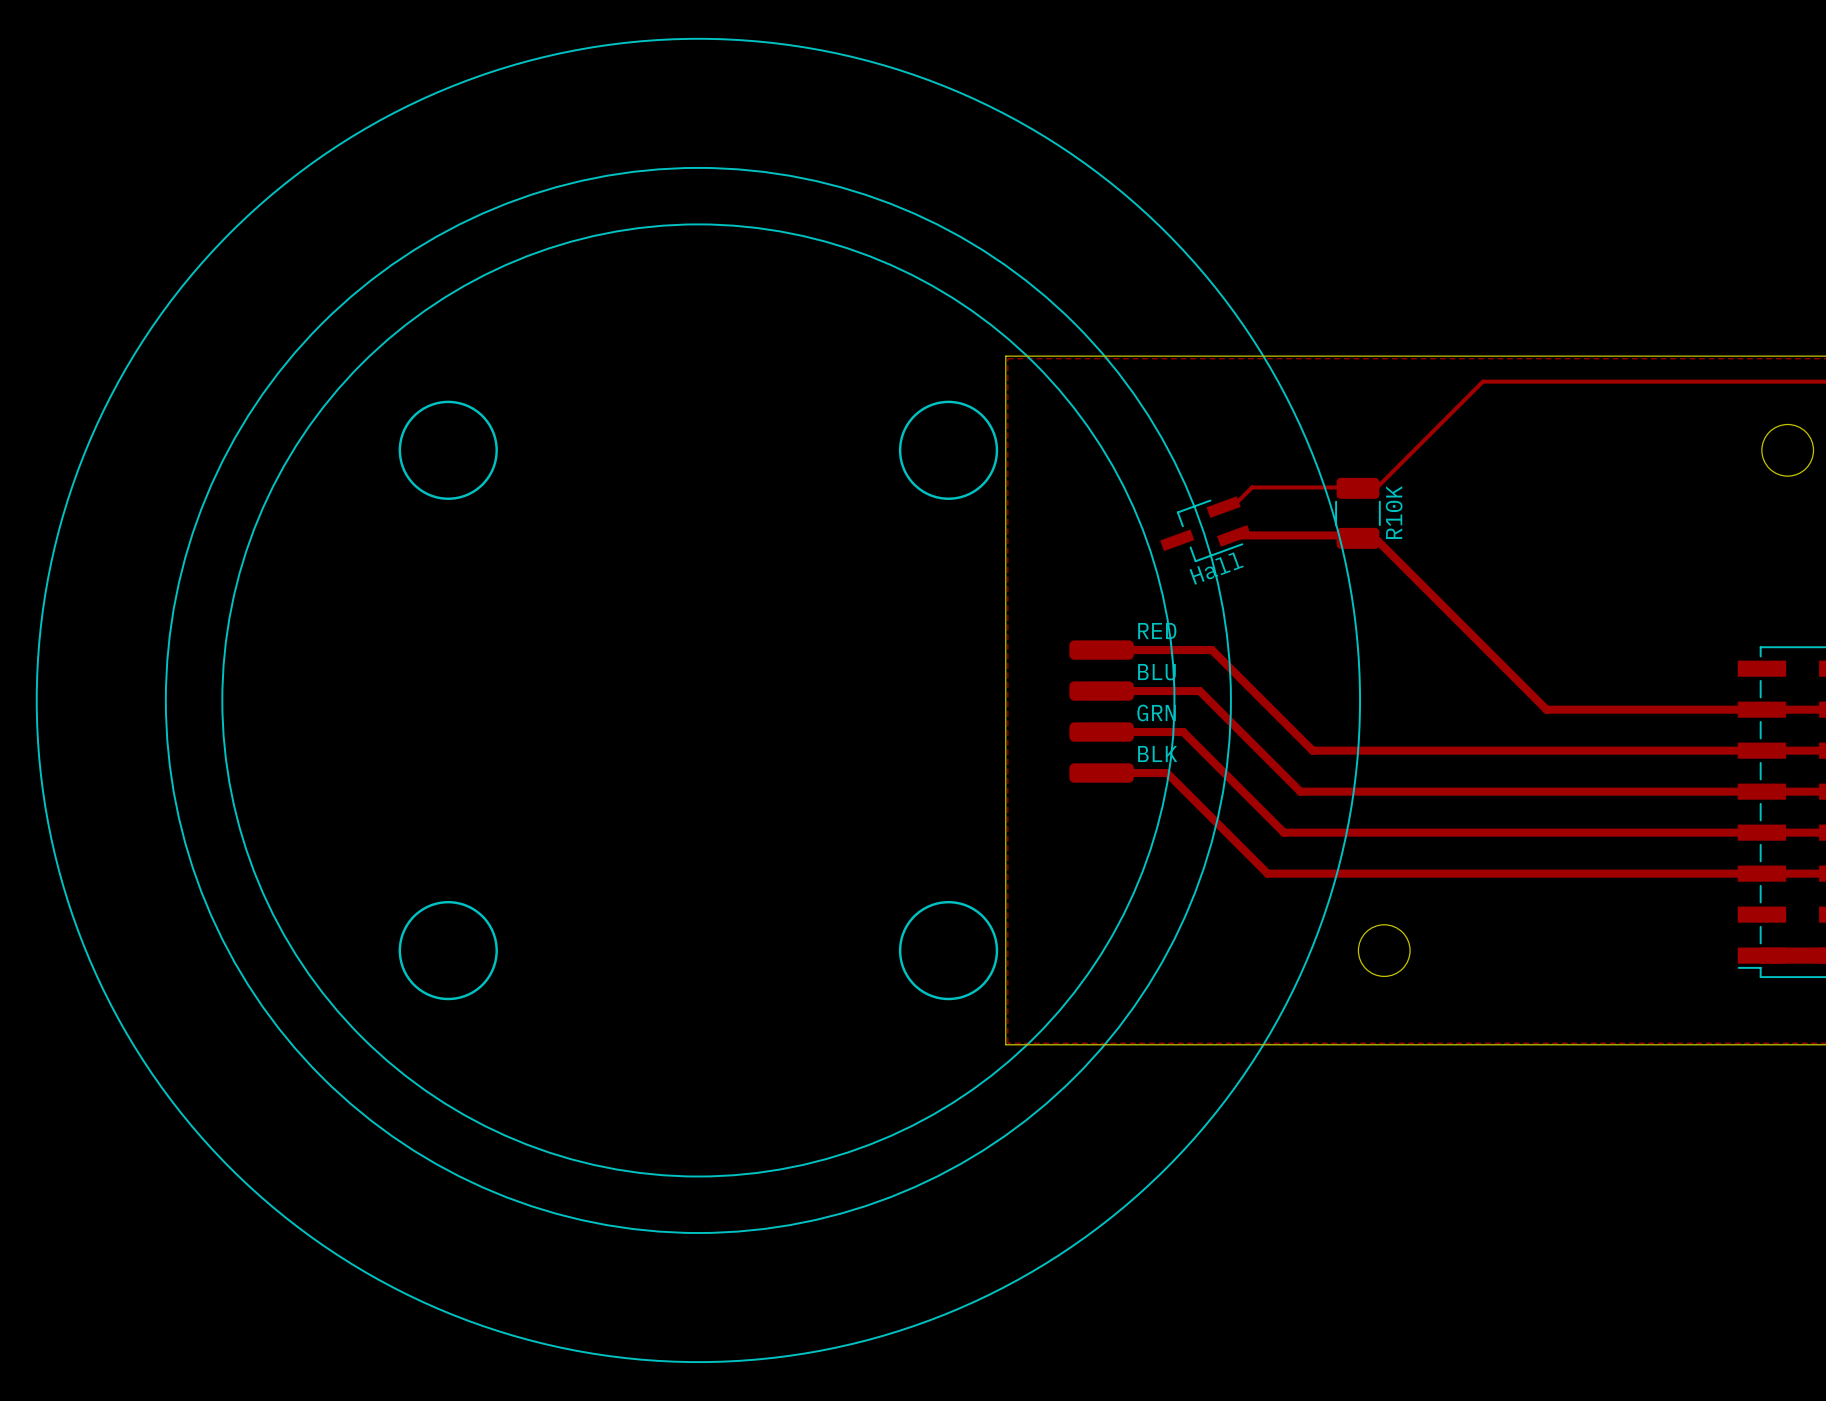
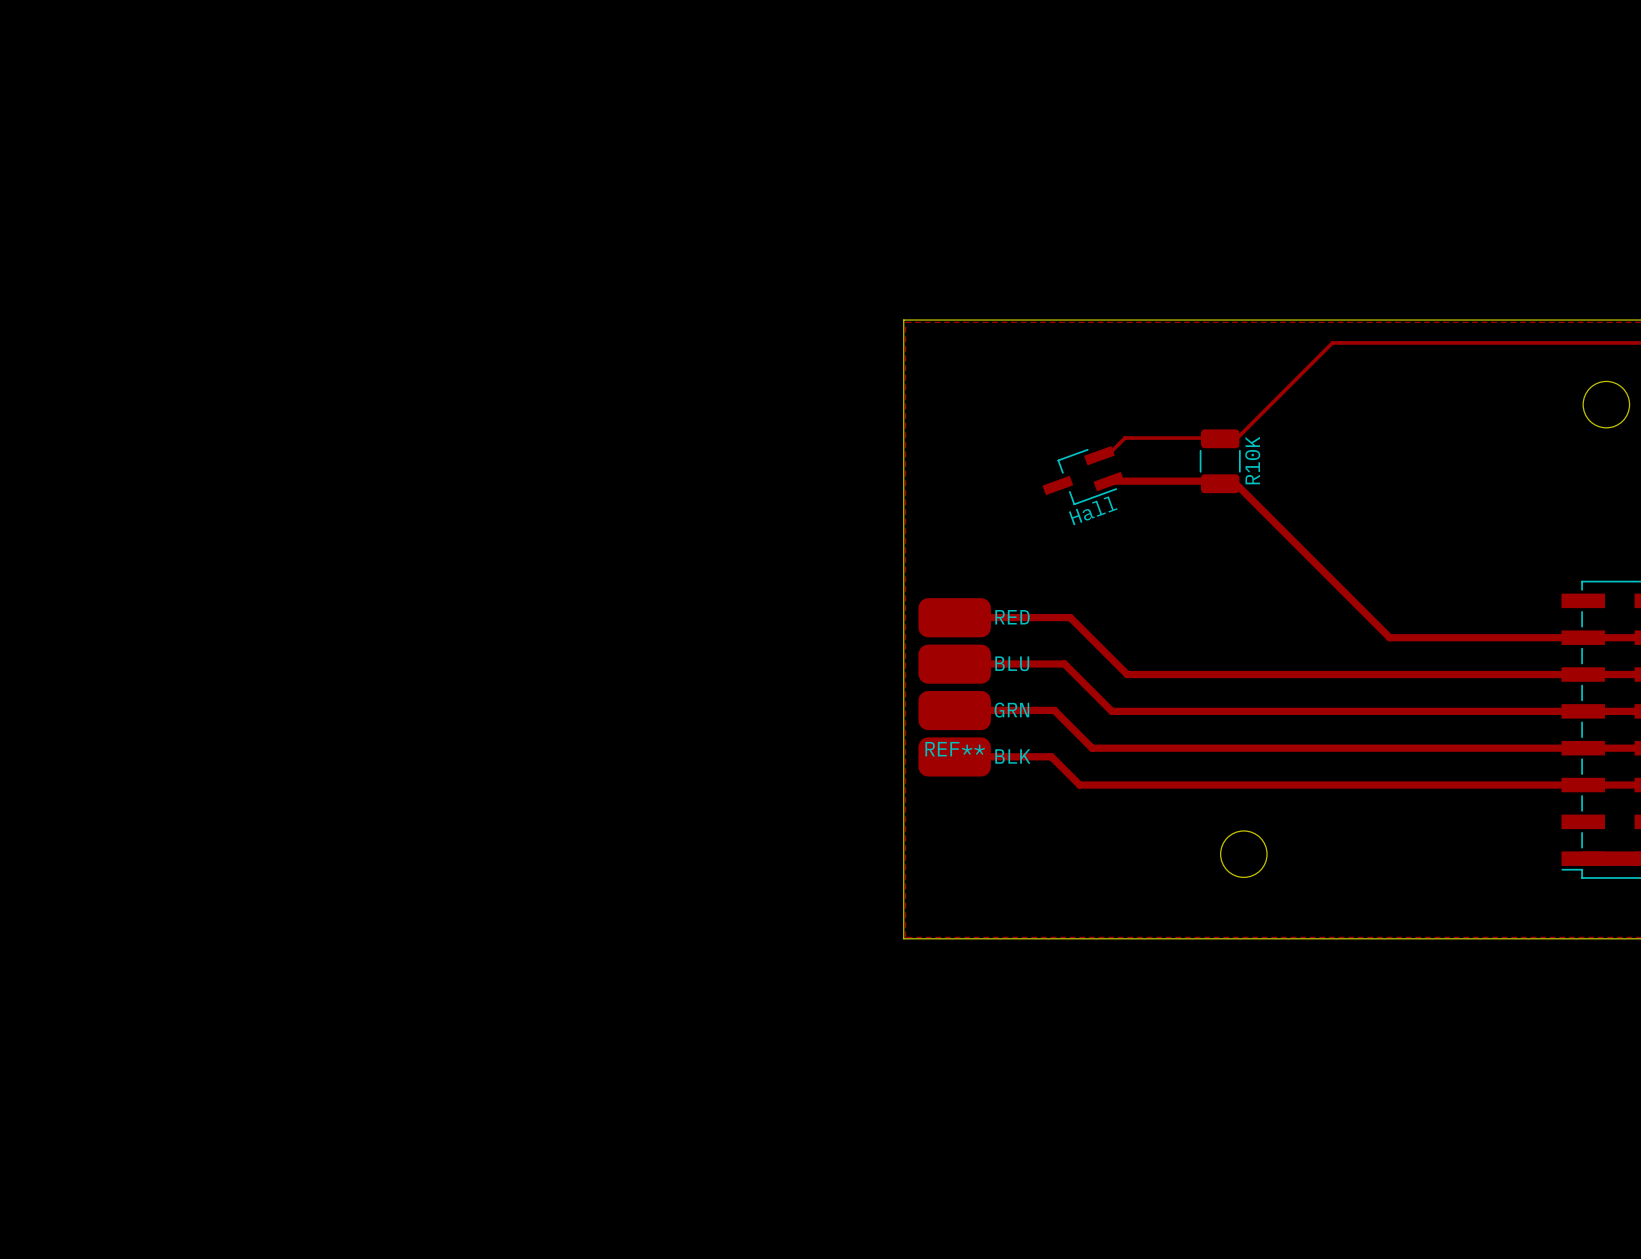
drawing: [35, 37, 1362, 1364] -> none
RED: (1101, 650) -> none
track: (1103, 650) (1212, 650) (1312, 750) -> (954, 617) (1070, 617) (1127, 674) (1179, 674)
text: none -> RED (1012, 617)
BLU: (1101, 691) -> none
track: (1103, 691) (1199, 691) (1300, 791) -> (954, 663) (1064, 663) (1111, 711) (1168, 711)
GRN: (1101, 732) -> none
track: (1103, 732) (1183, 732) (1283, 832) -> (954, 710) (1054, 710) (1092, 748) (1153, 748)
text: none -> BLU (1012, 663)
REF**: none -> (954, 687)
BLK: (1101, 773) -> none
track: (1103, 773) (1166, 773) (1267, 873) -> (954, 756) (1051, 756) (1079, 785) (1139, 785)
text: none -> GRN (1011, 710)
text: none -> BLK (1012, 756)

